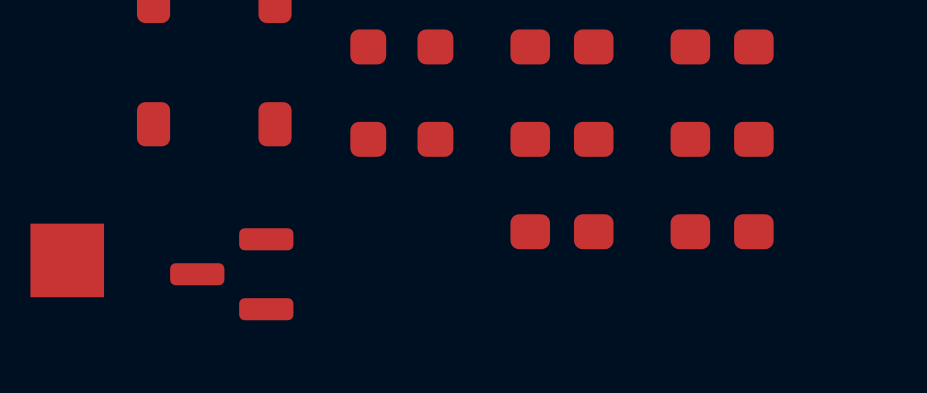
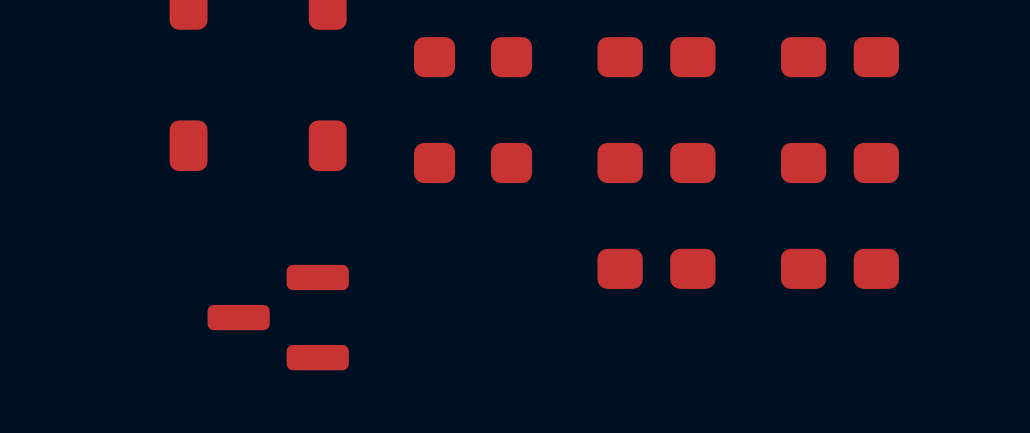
part: (67, 260) -> none

